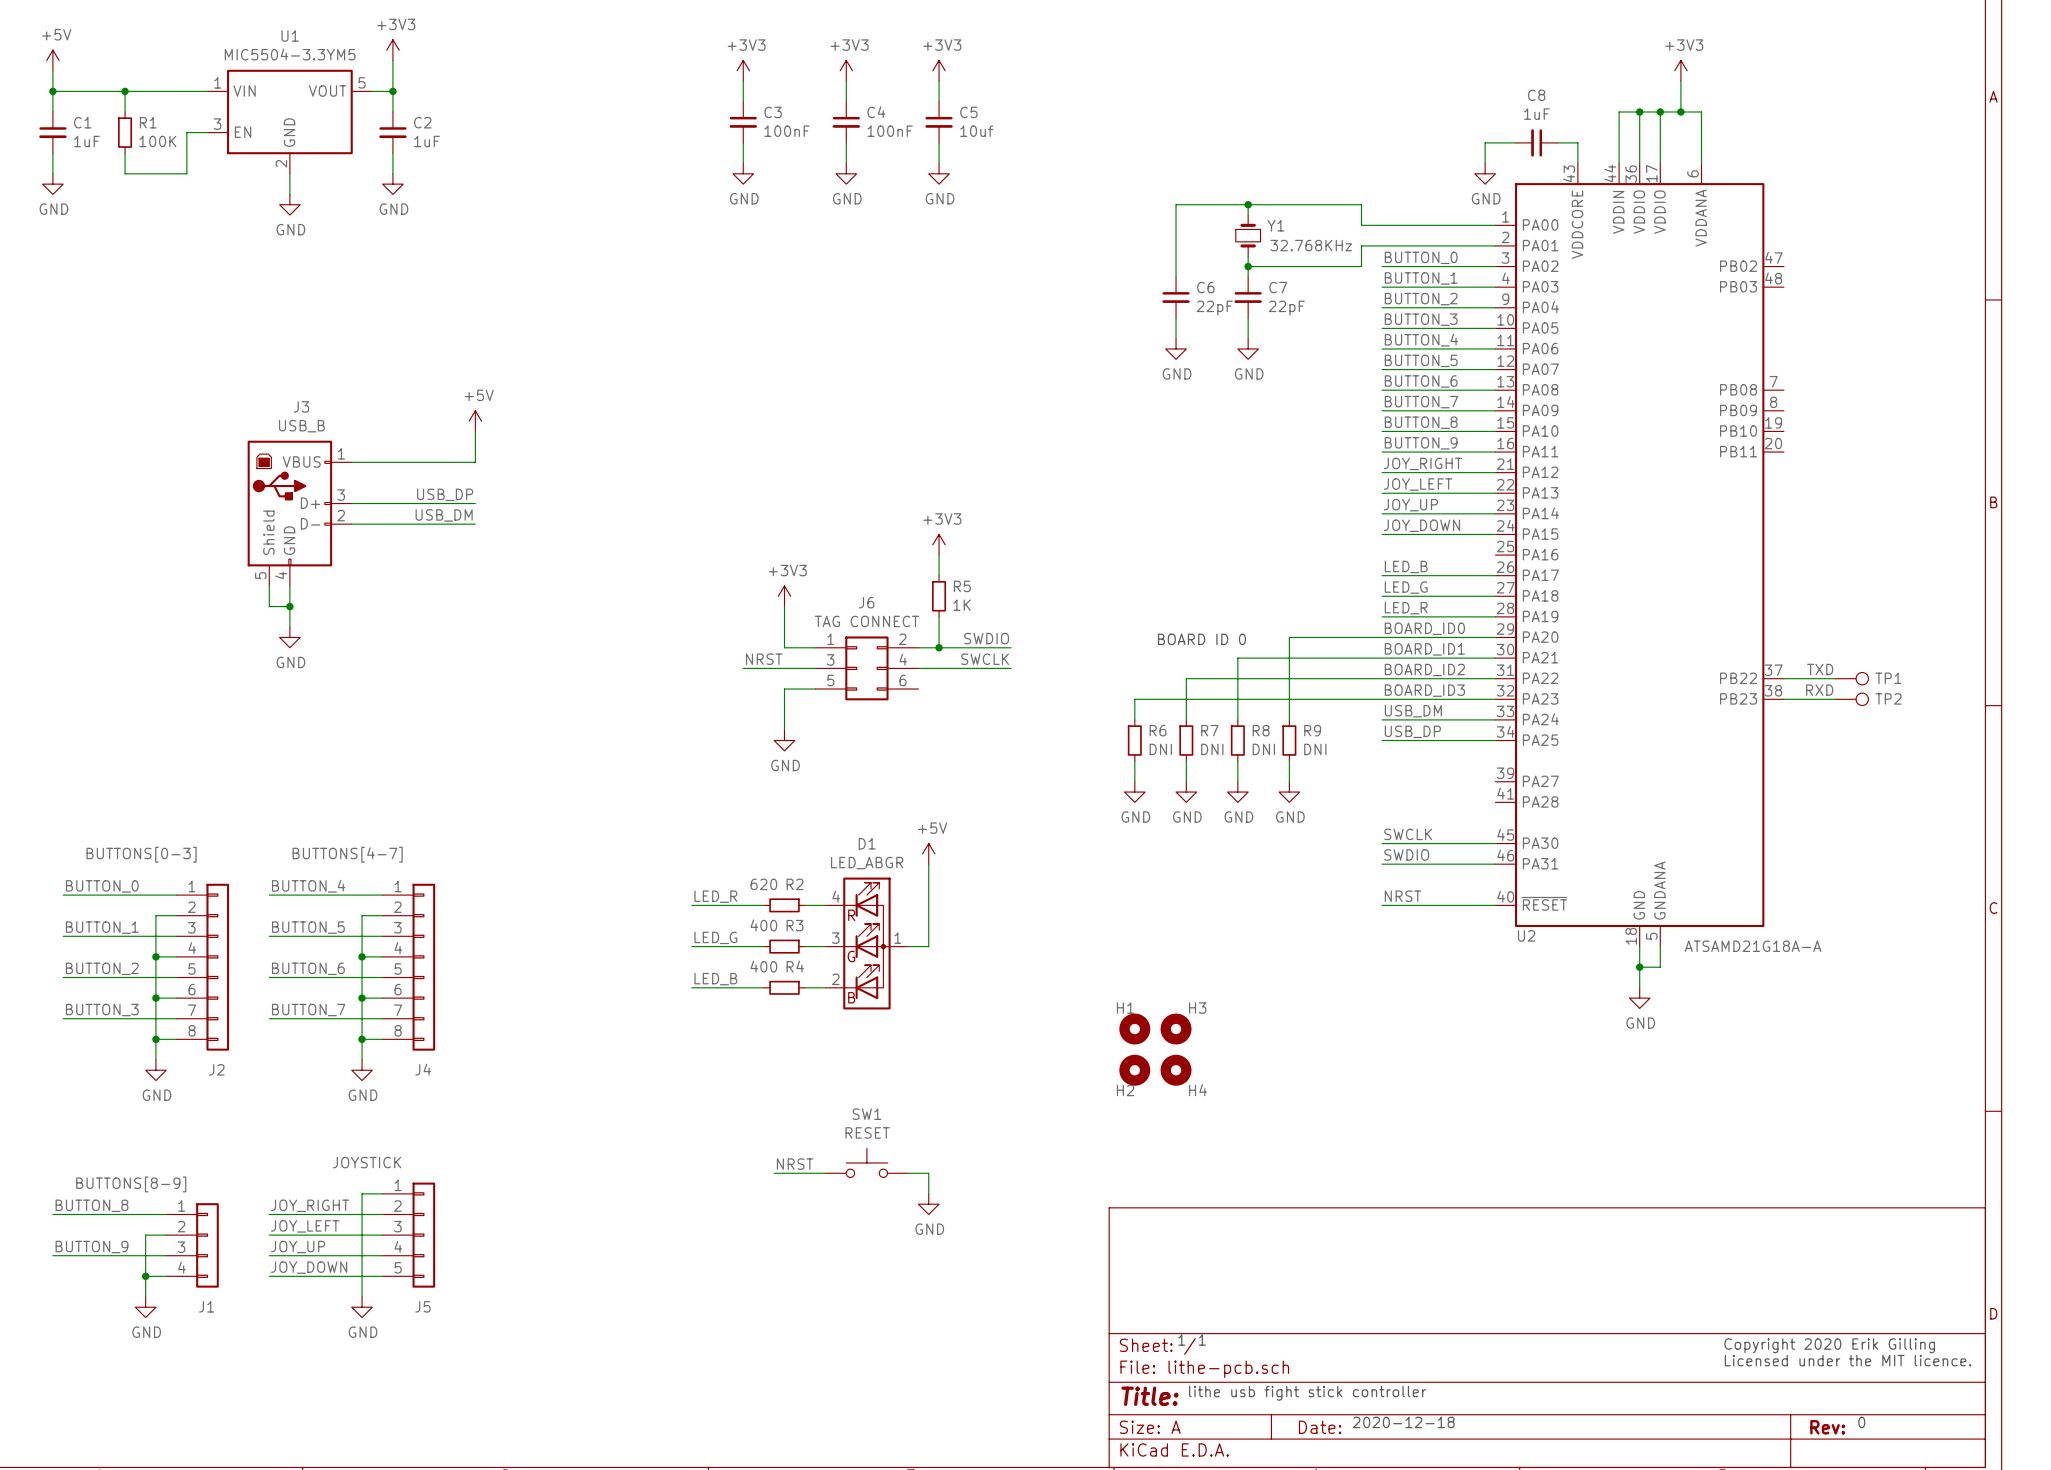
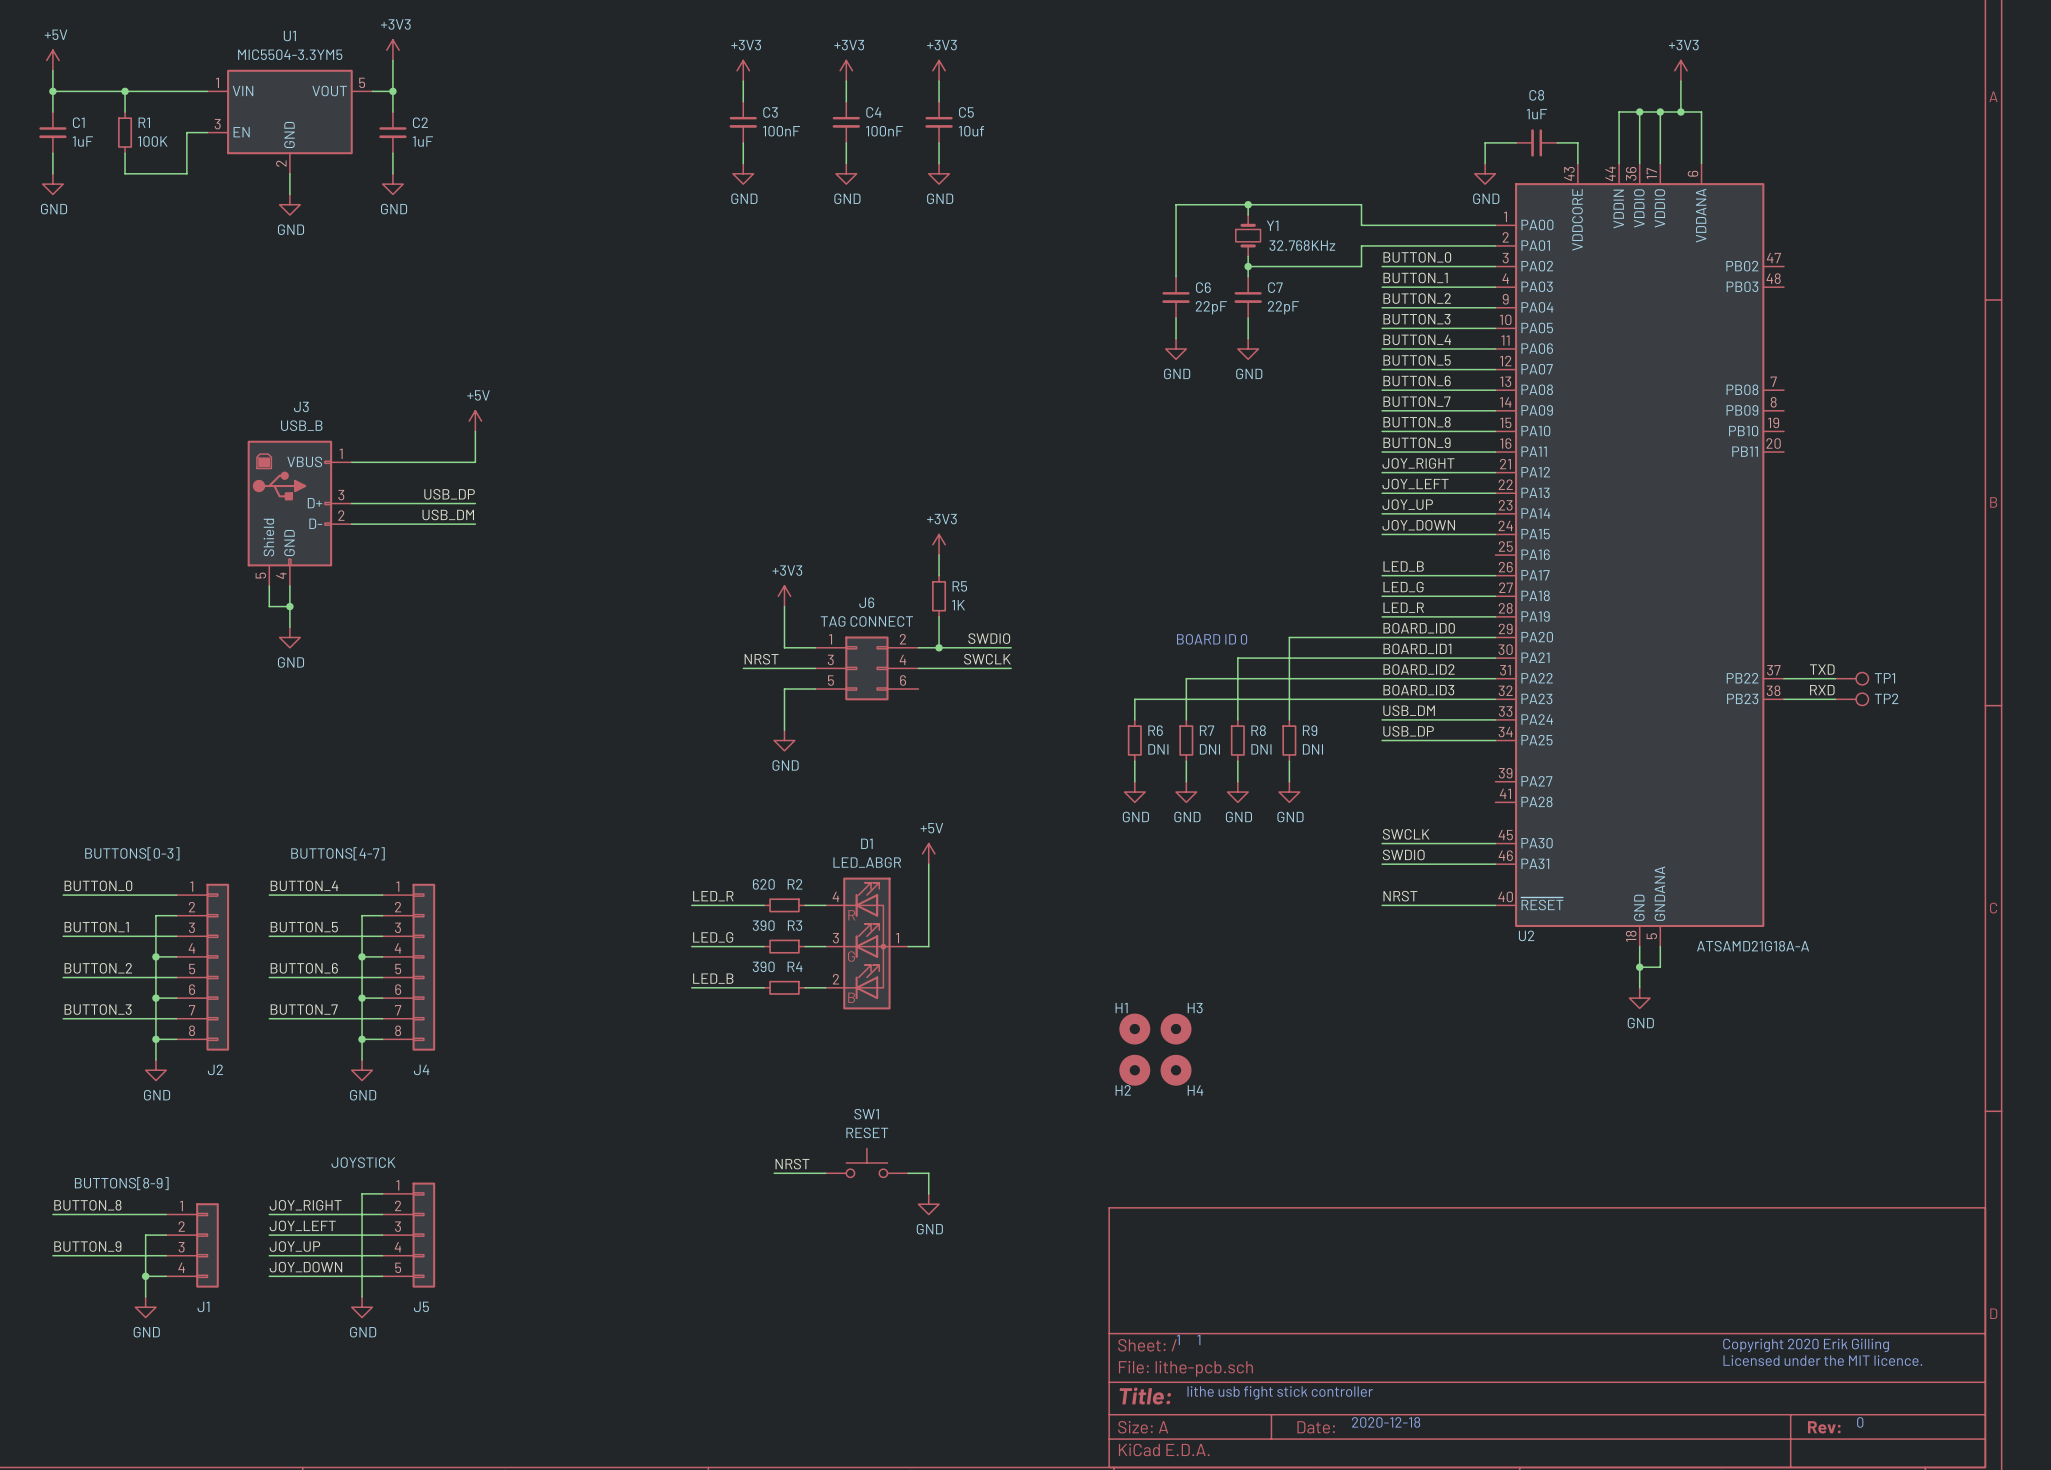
R3 value: 400 (763, 925) -> 390 (763, 925)
R4 value: 400 (763, 966) -> 390 (763, 966)

